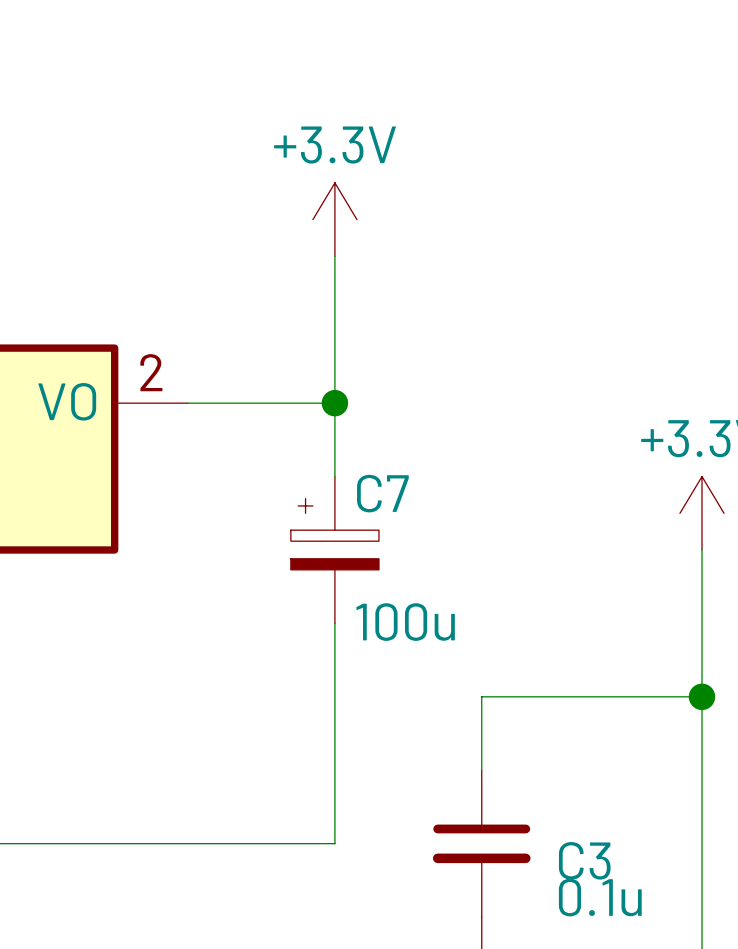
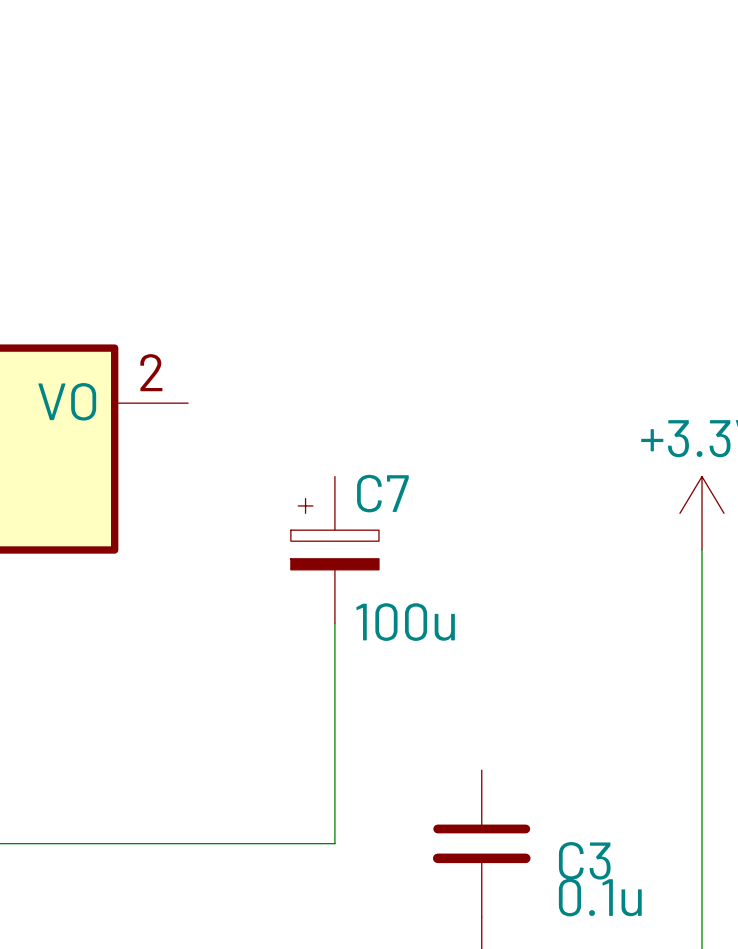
power symbol: +3.3V (334, 219) -> none
wire: (334, 256) (334, 476) -> none
wire: (188, 403) (334, 403) -> none
junction: (334, 403) -> none
wire: (702, 696) (481, 696) (481, 770) -> none
junction: (702, 696) -> none

